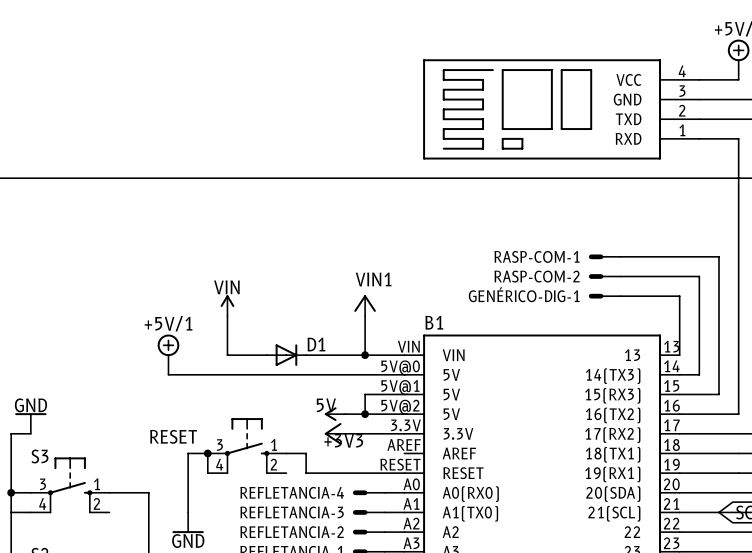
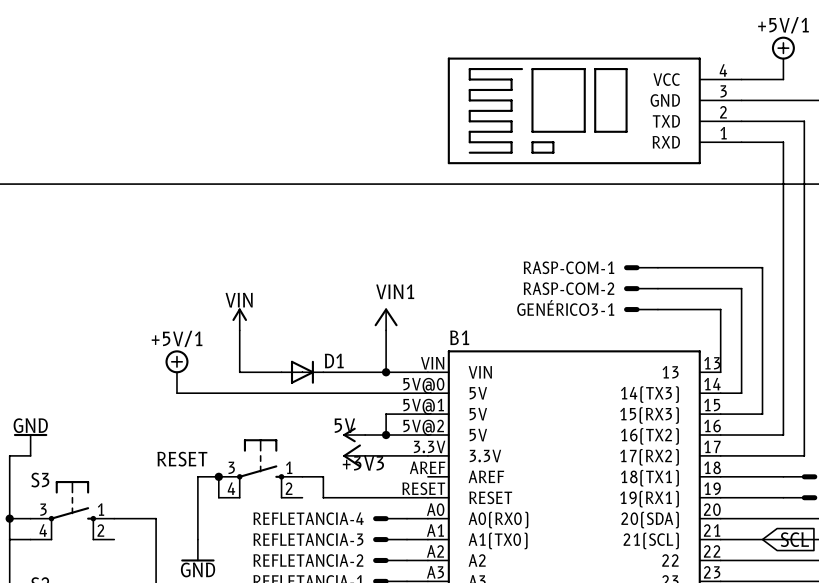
GENÉRICO-DIG-1 name: GENÉRICO-DIG-1 (524, 294) -> GENÉRICO3-1 (565, 307)

